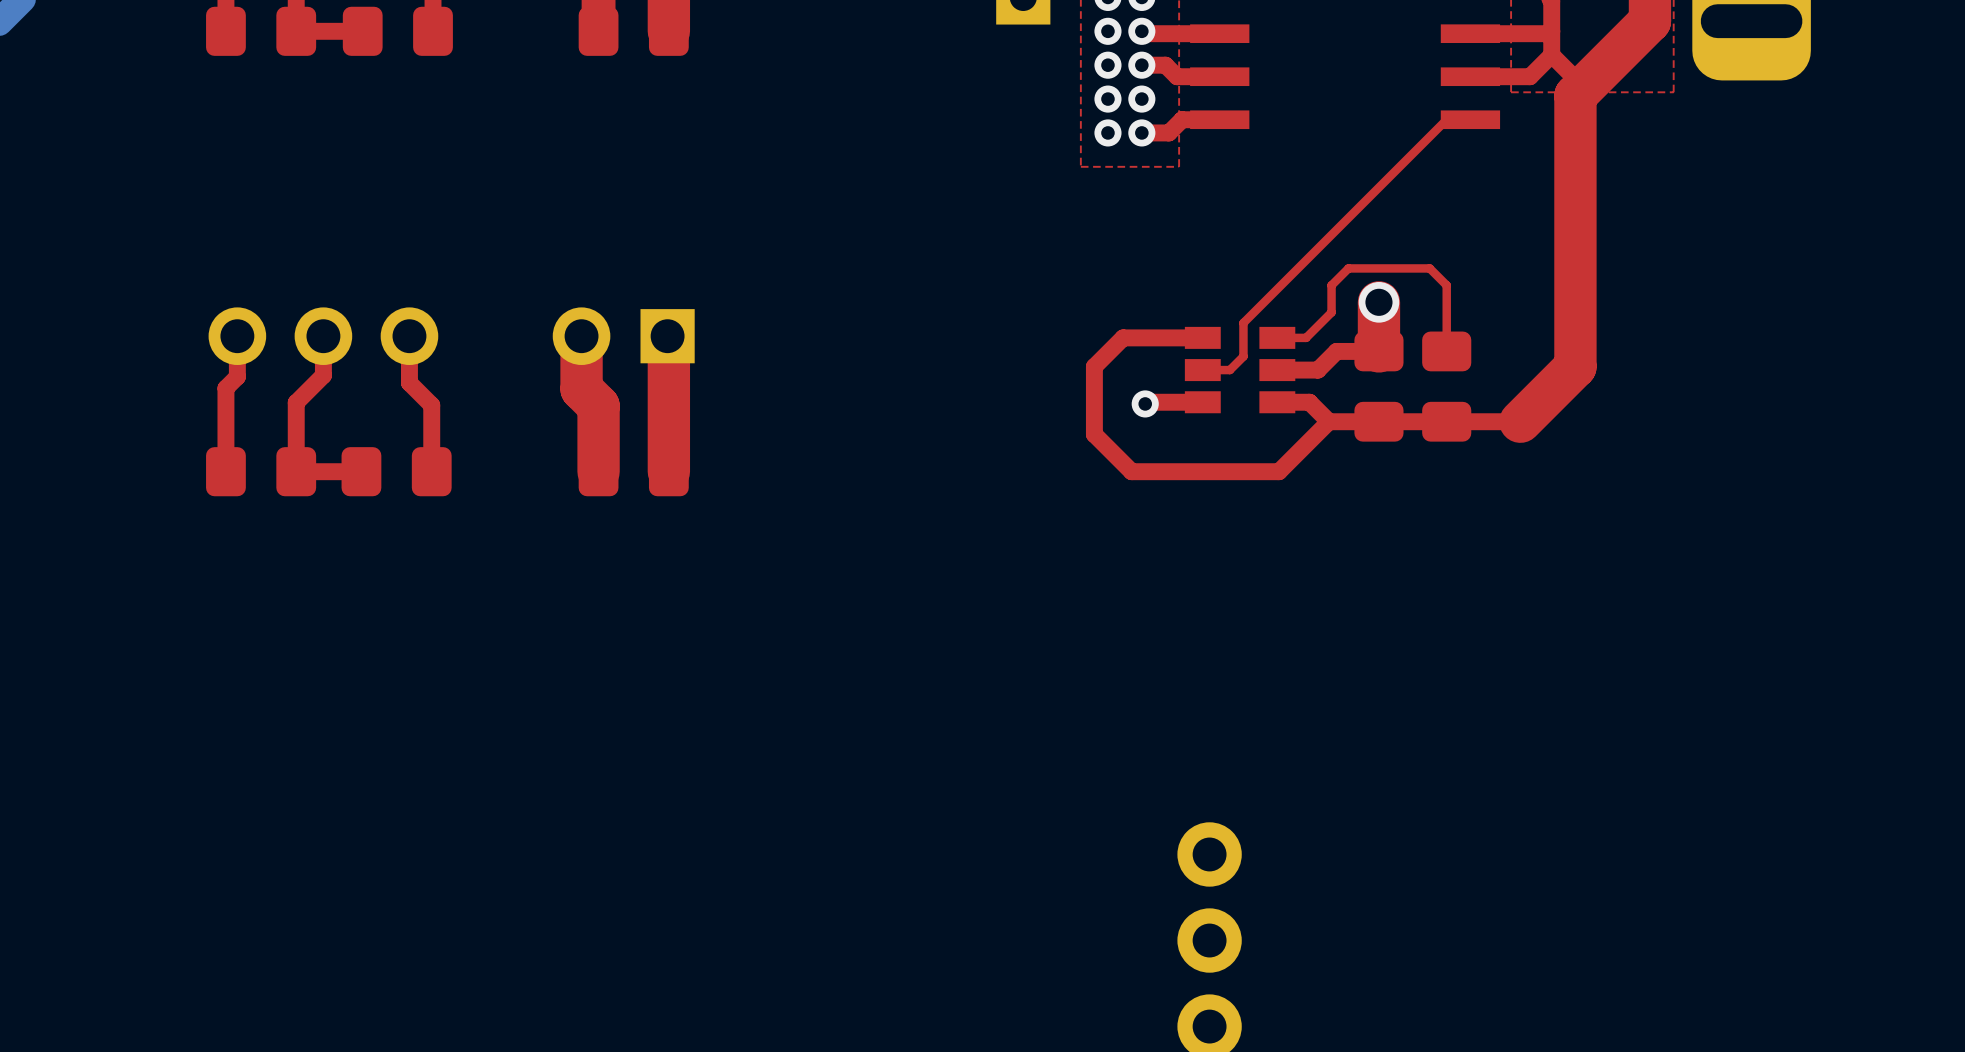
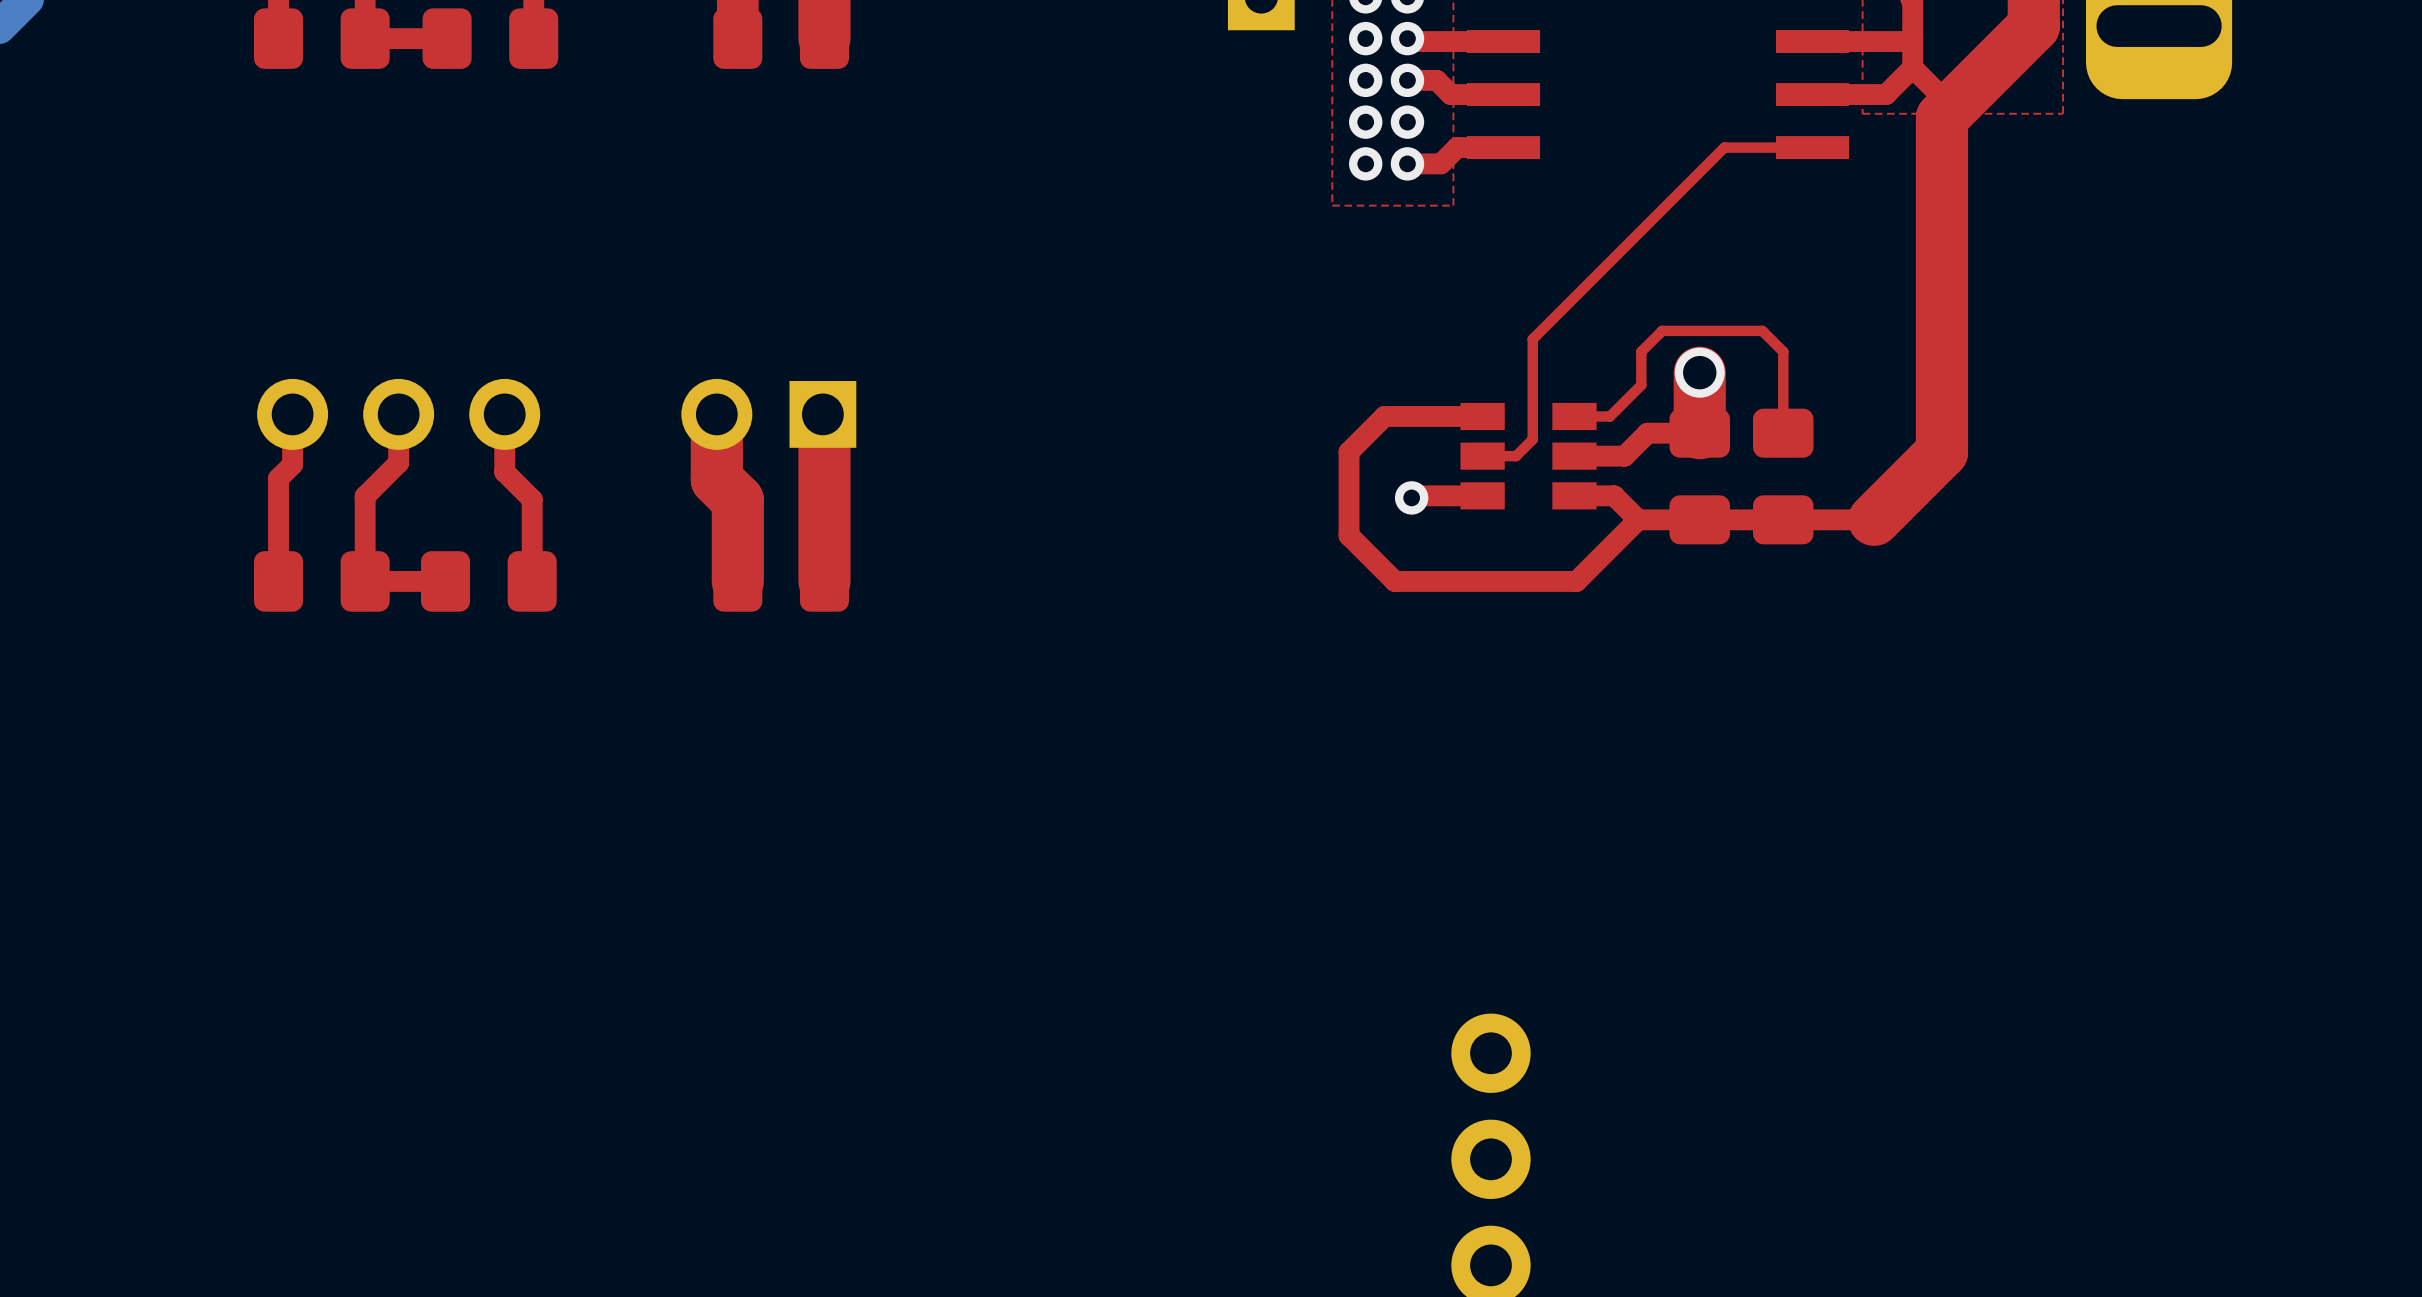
top track: (1446, 119) (1243, 322) -> (1783, 147) (1724, 147) (1532, 339) (1532, 398)

